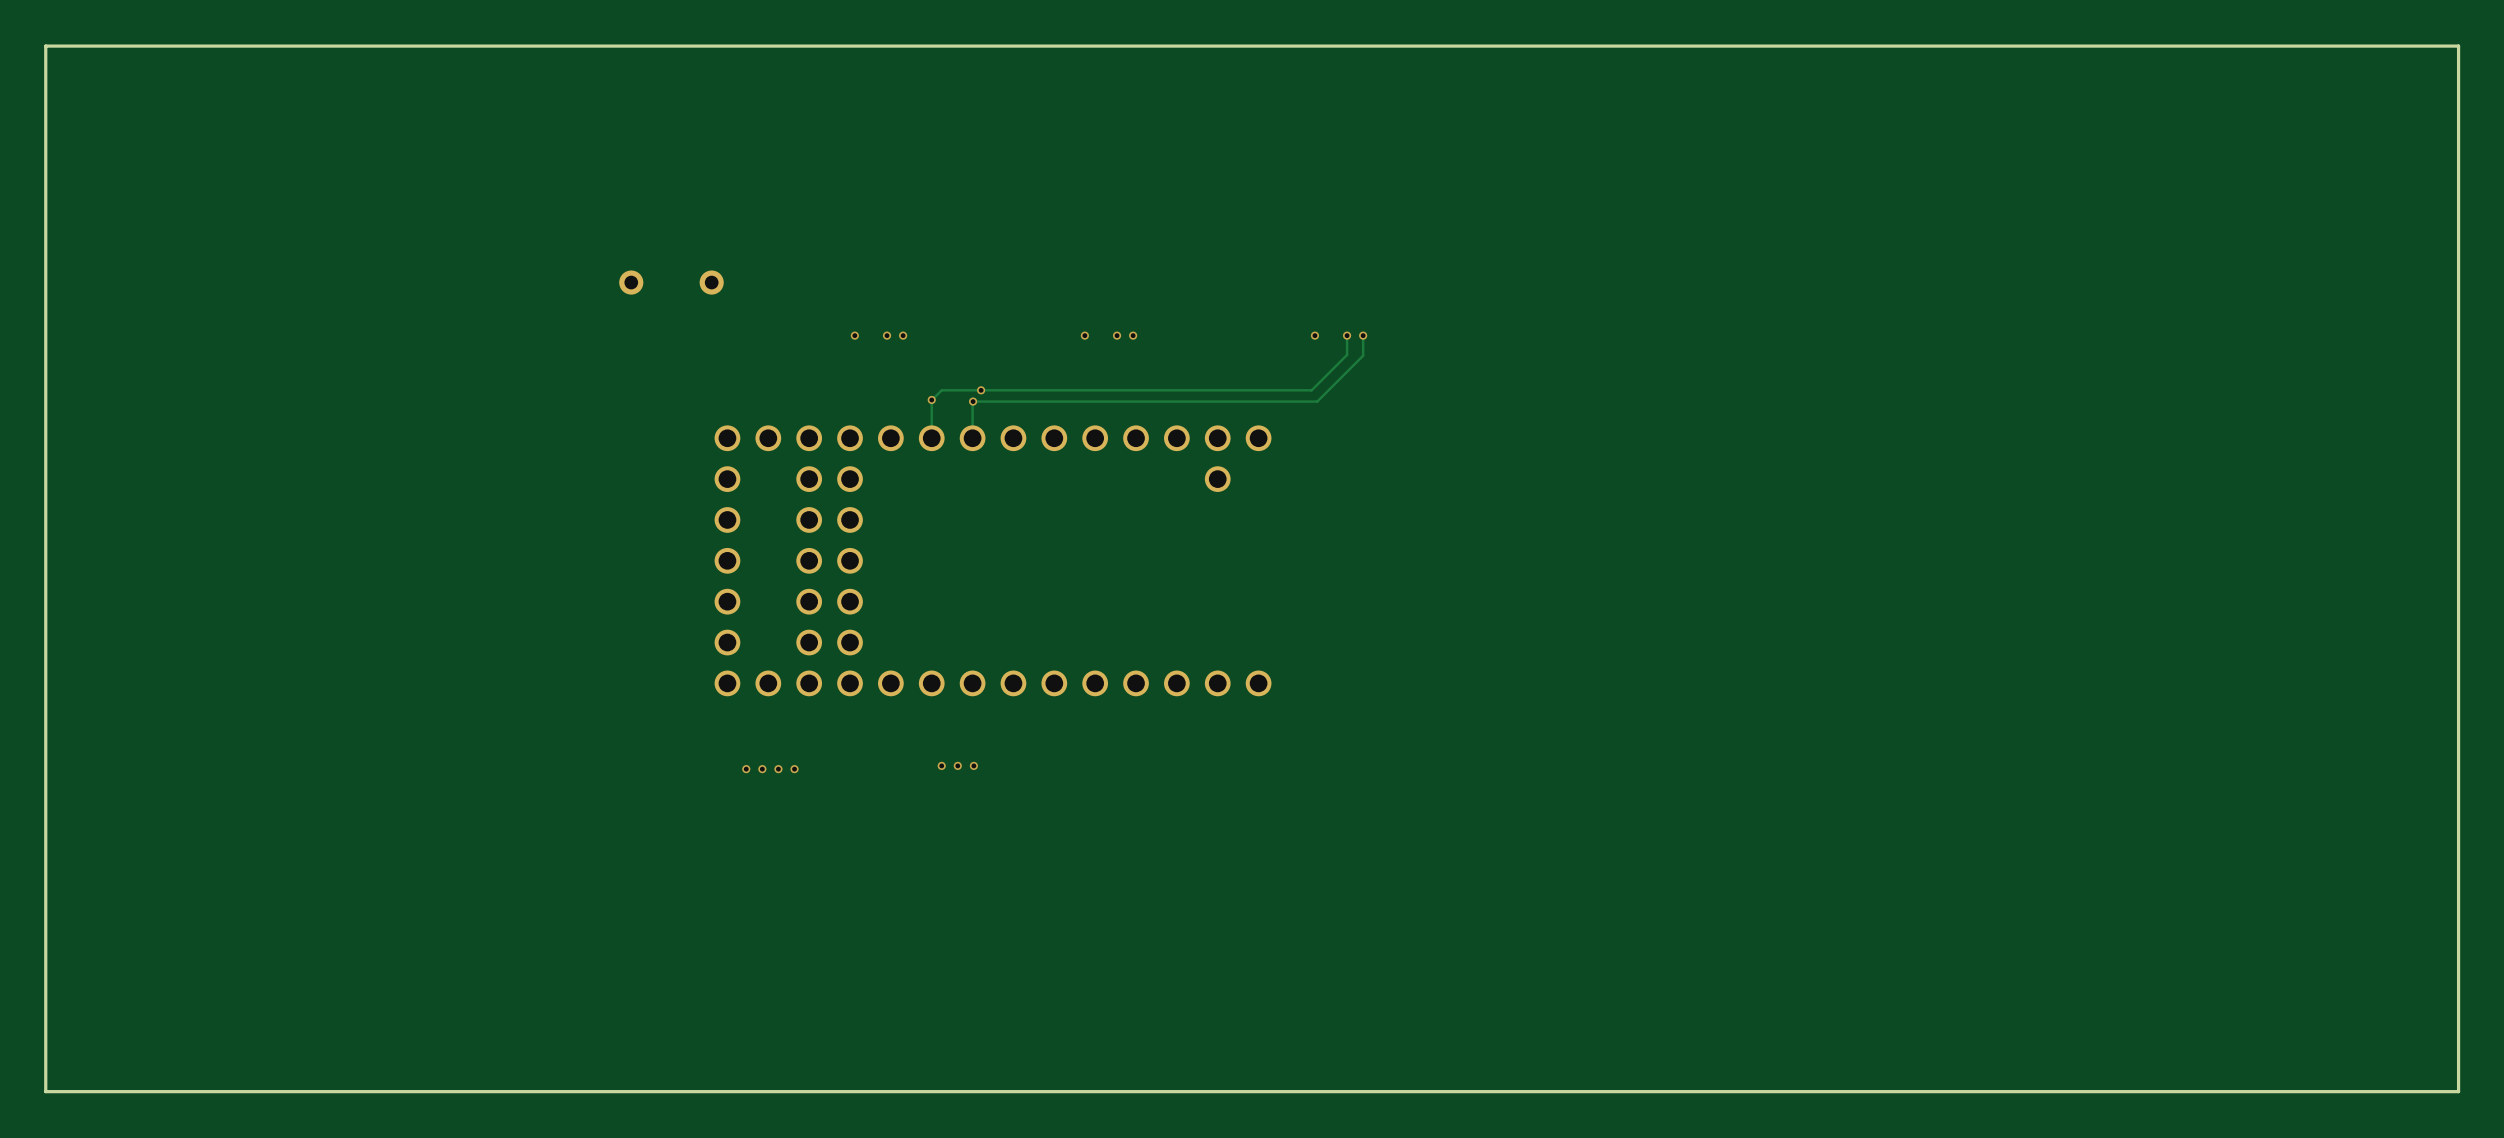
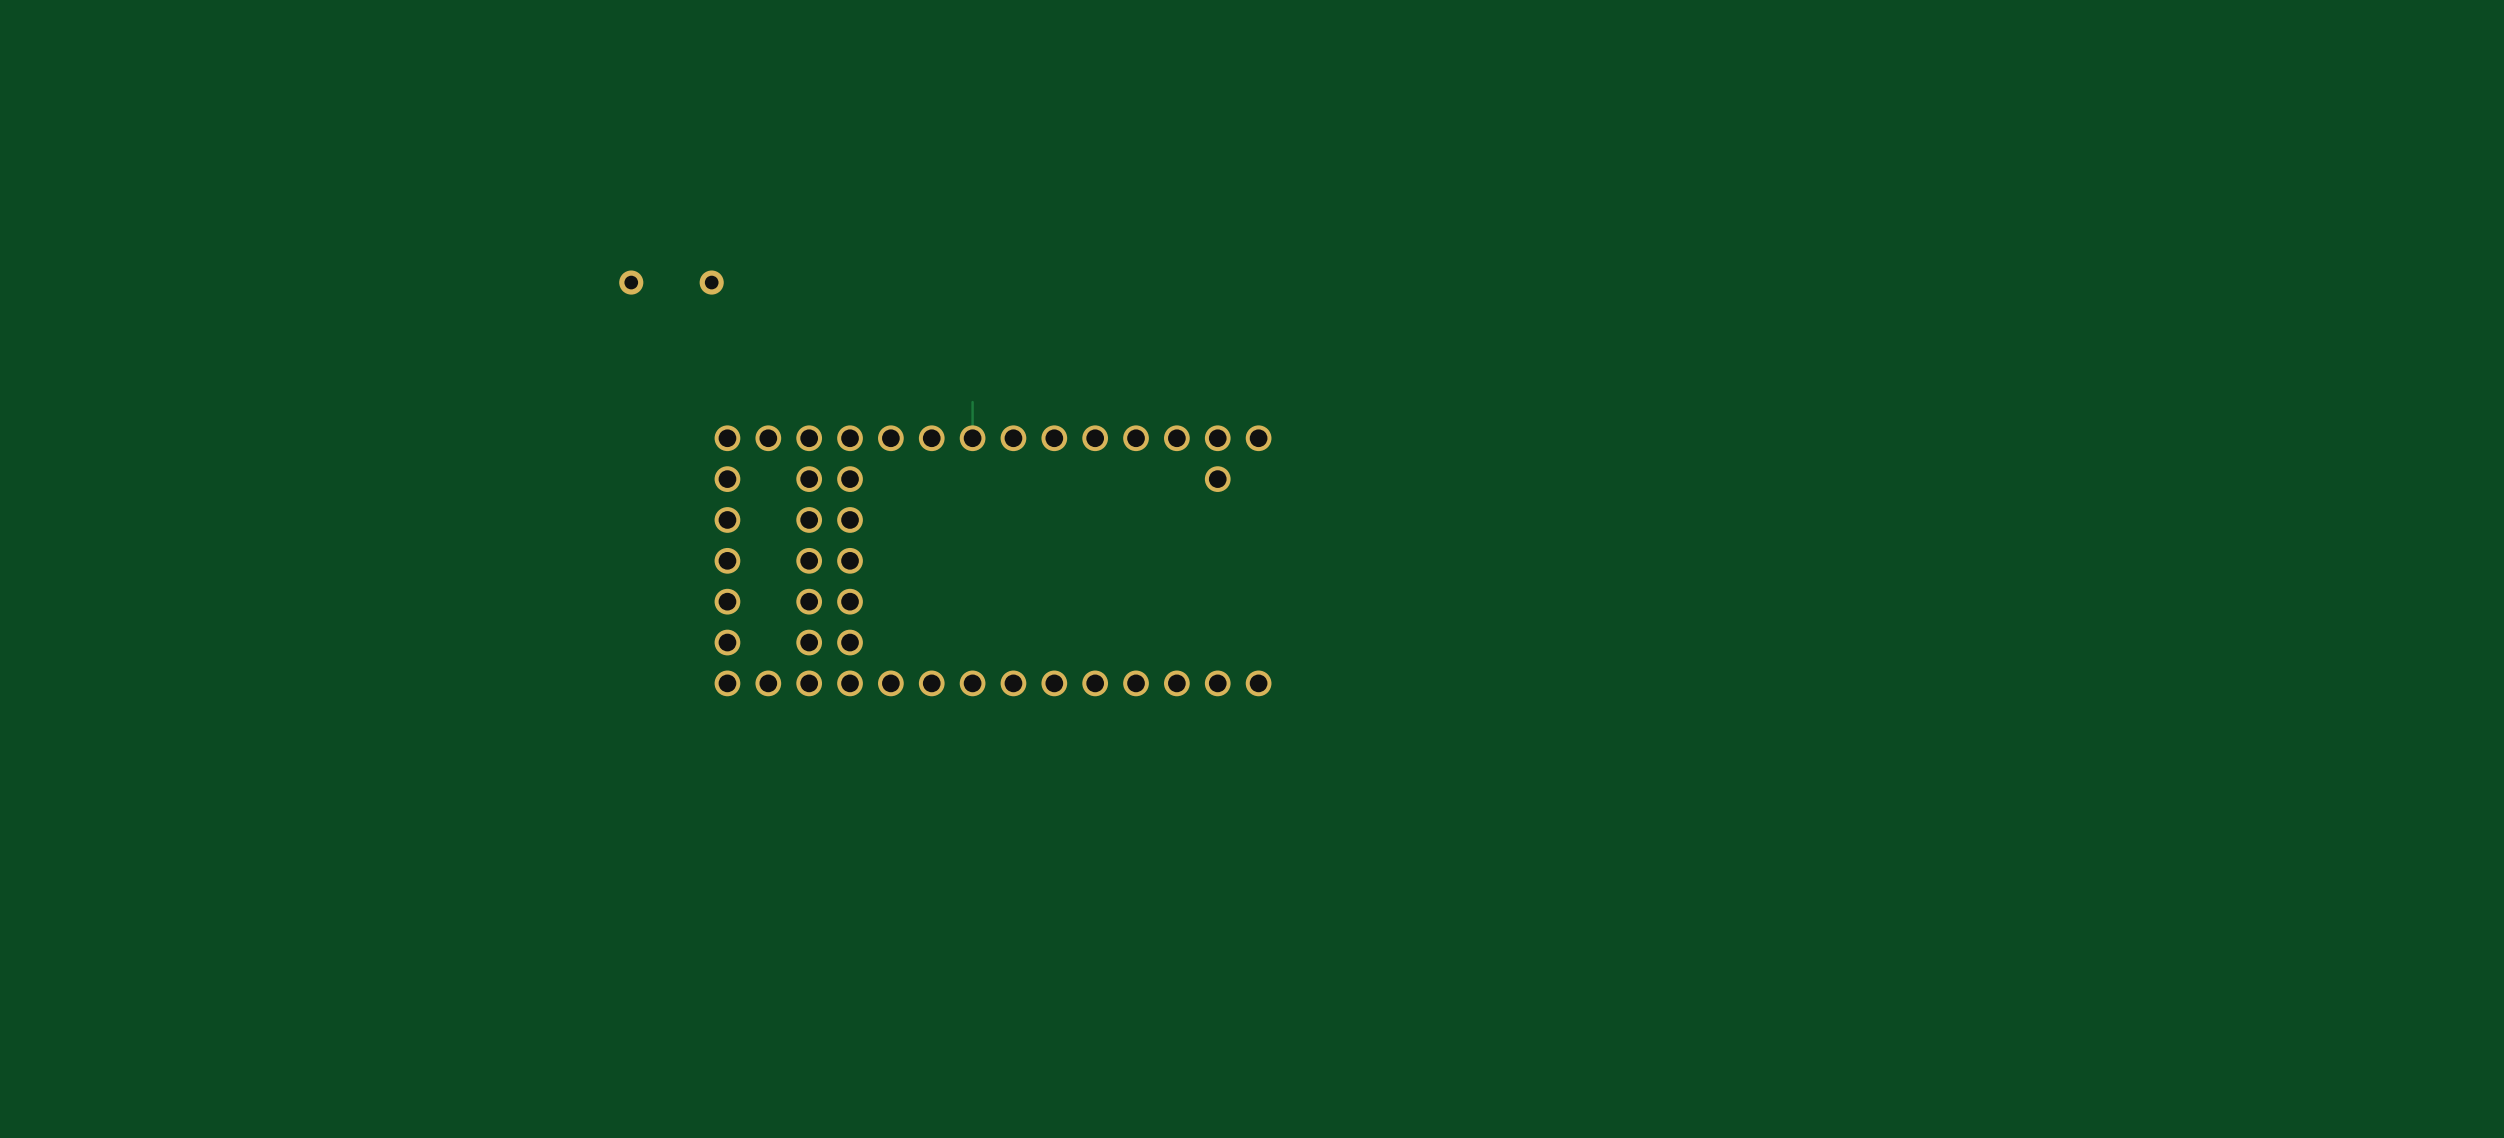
board edge: (2458, 46) (45, 46) (45, 1091) (2458, 1091) (2458, 46) -> none
track: (1347, 334) (1347, 354) (1311, 390) (941, 390) (932, 399) -> none
track: (1363, 334) (1363, 355) (1317, 401) (973, 401) -> none
via: (854, 335) -> none
via: (887, 335) -> none
via: (903, 335) -> none
via: (1084, 335) -> none
via: (1117, 335) -> none
via: (1133, 335) -> none
via: (1314, 335) -> none
via: (1347, 335) -> none
via: (1363, 335) -> none
via: (981, 390) -> none
track: (931, 399) (931, 438) -> none
via: (931, 399) -> none
via: (973, 401) -> none
via: (941, 765) -> none
via: (957, 765) -> none
via: (973, 765) -> none
via: (746, 769) -> none
via: (762, 769) -> none
via: (778, 769) -> none
via: (794, 769) -> none

